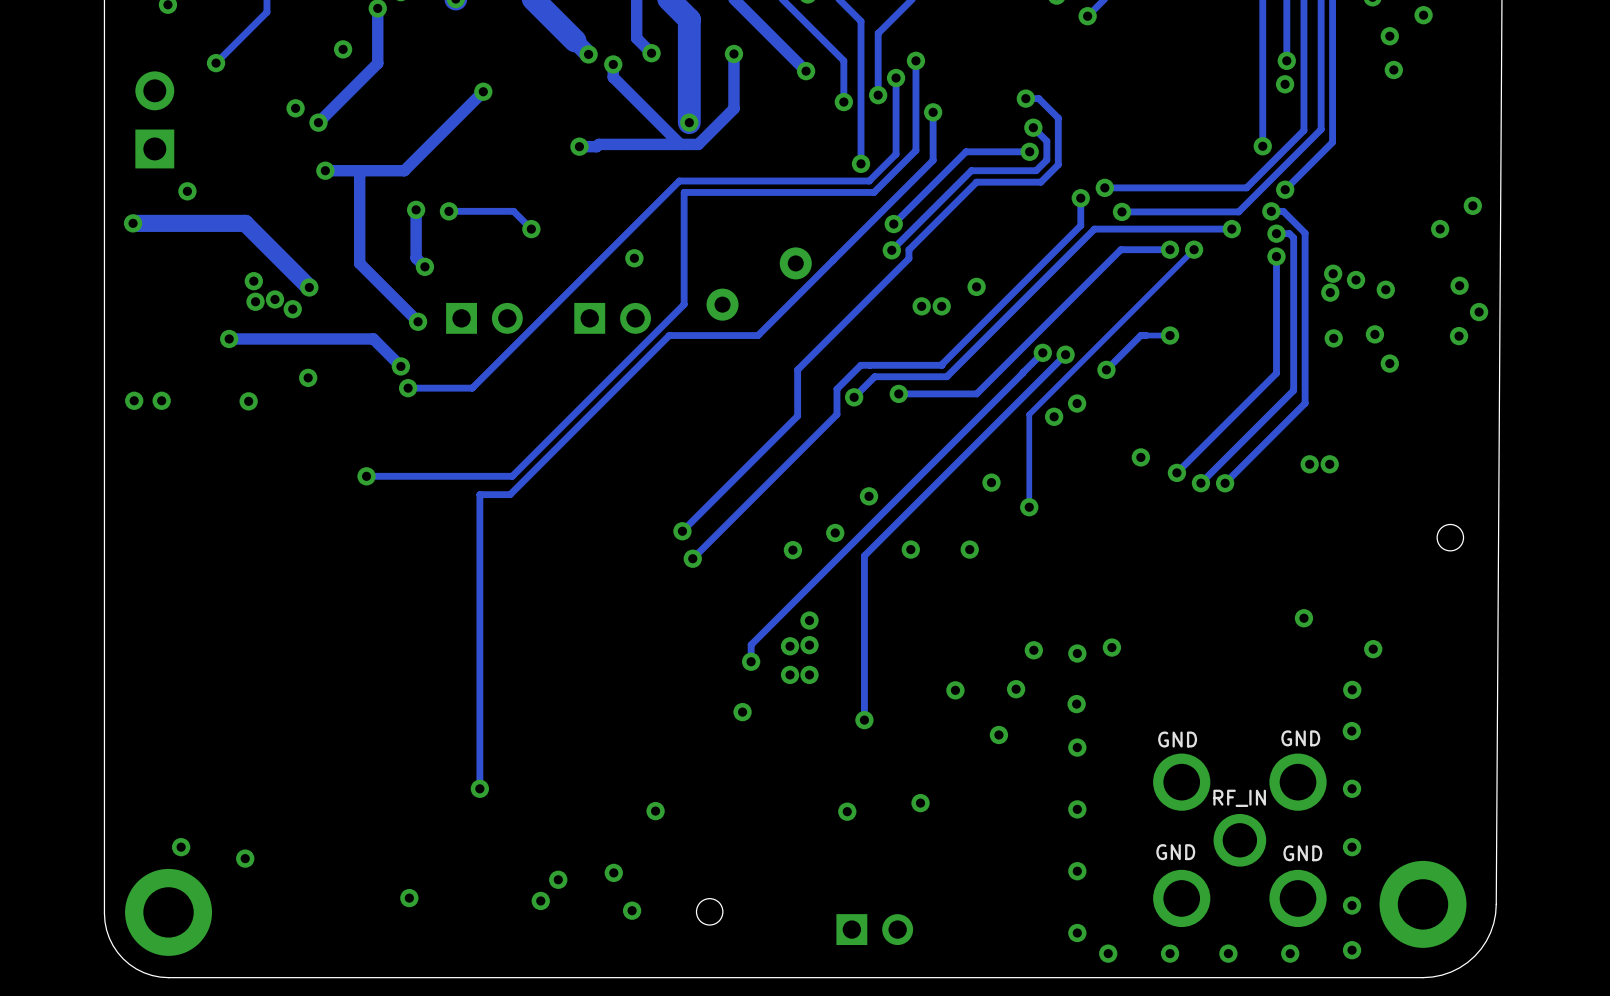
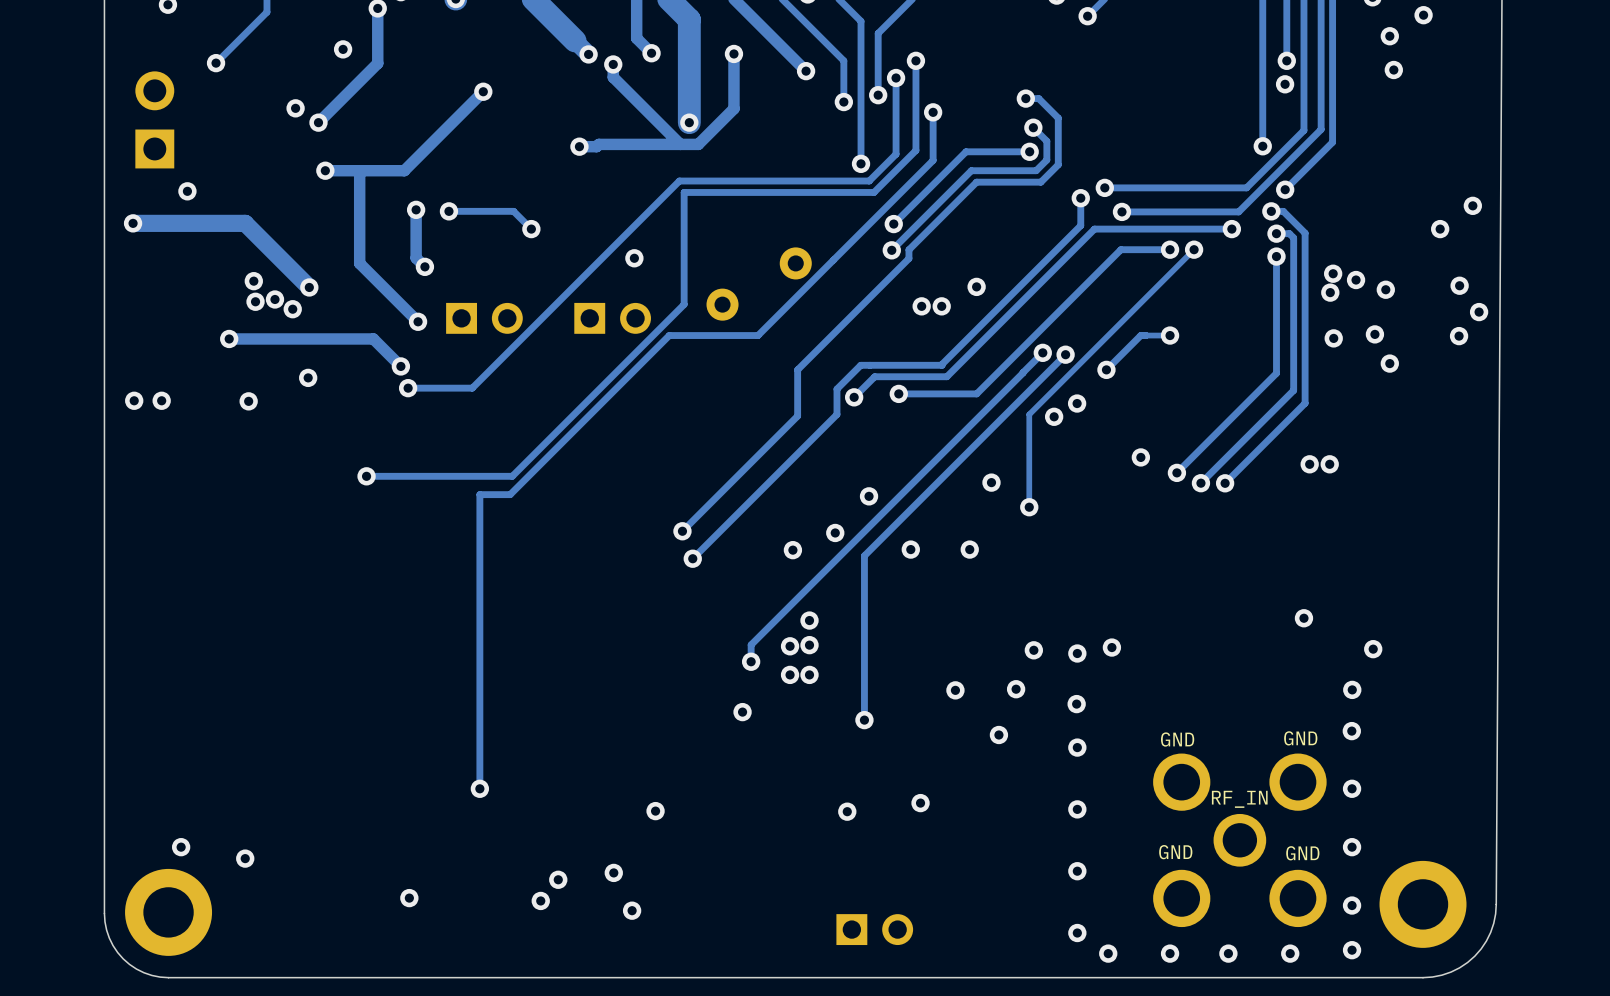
round board edge: [1436, 523, 1465, 552] -> none
round board edge: [695, 898, 724, 926] -> none

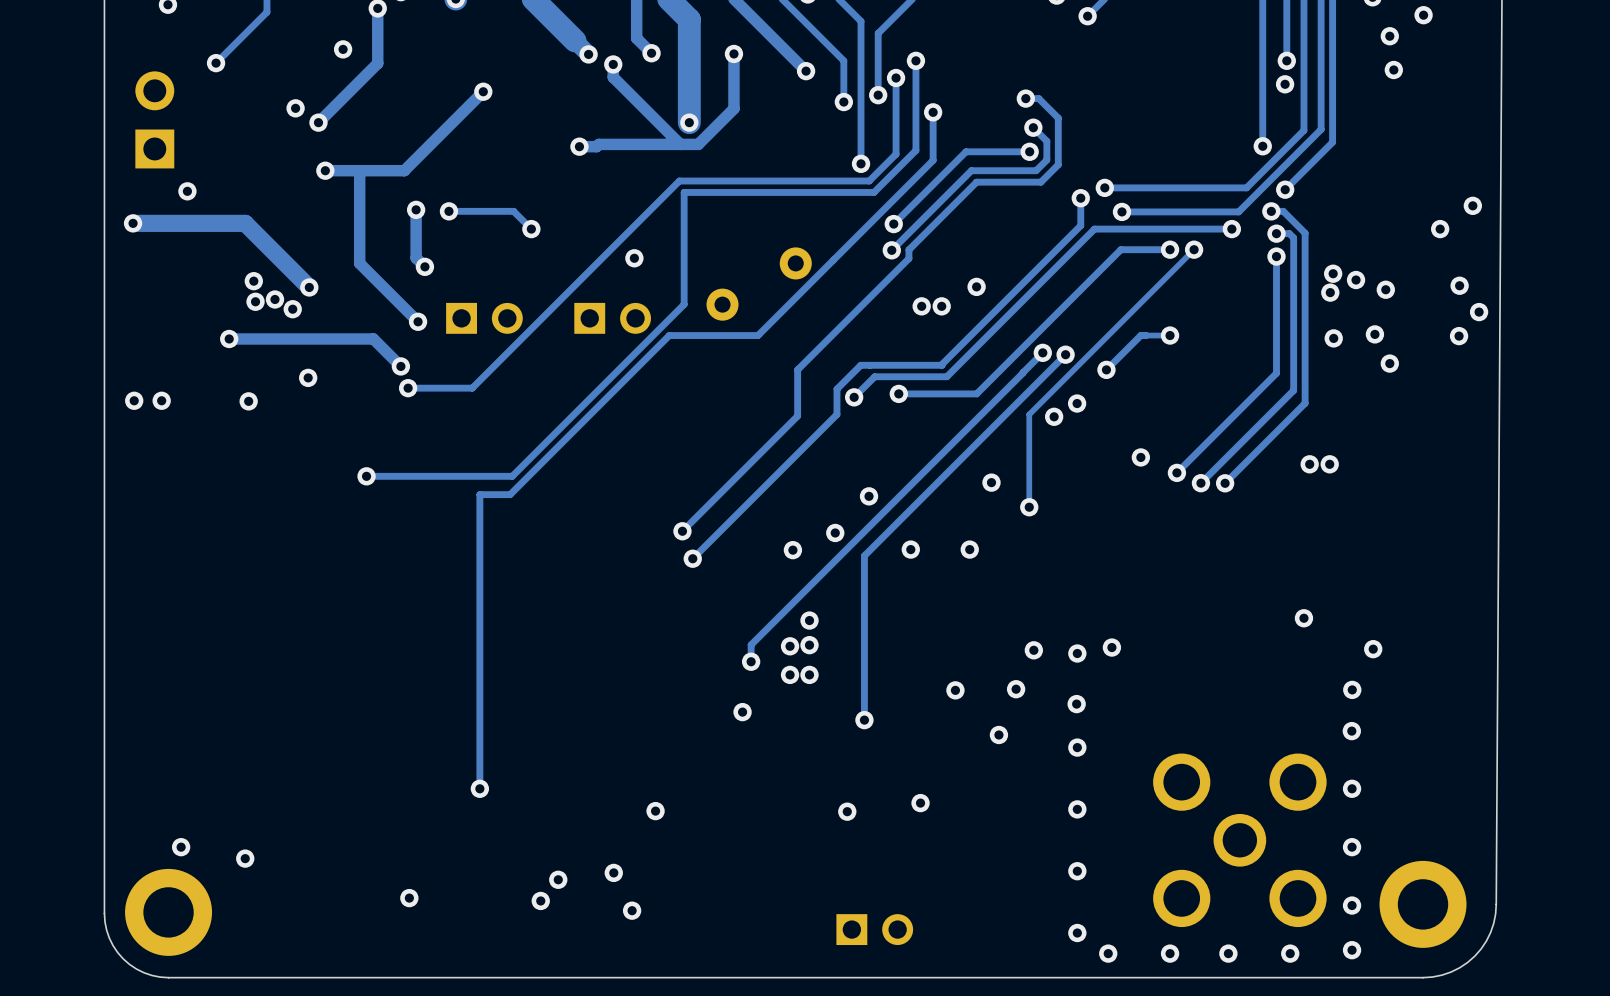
text: GND (1300, 738) -> none
text: GND (1177, 739) -> none
text: RF_IN (1239, 799) -> none
text: GND (1175, 852) -> none
text: GND (1302, 853) -> none

